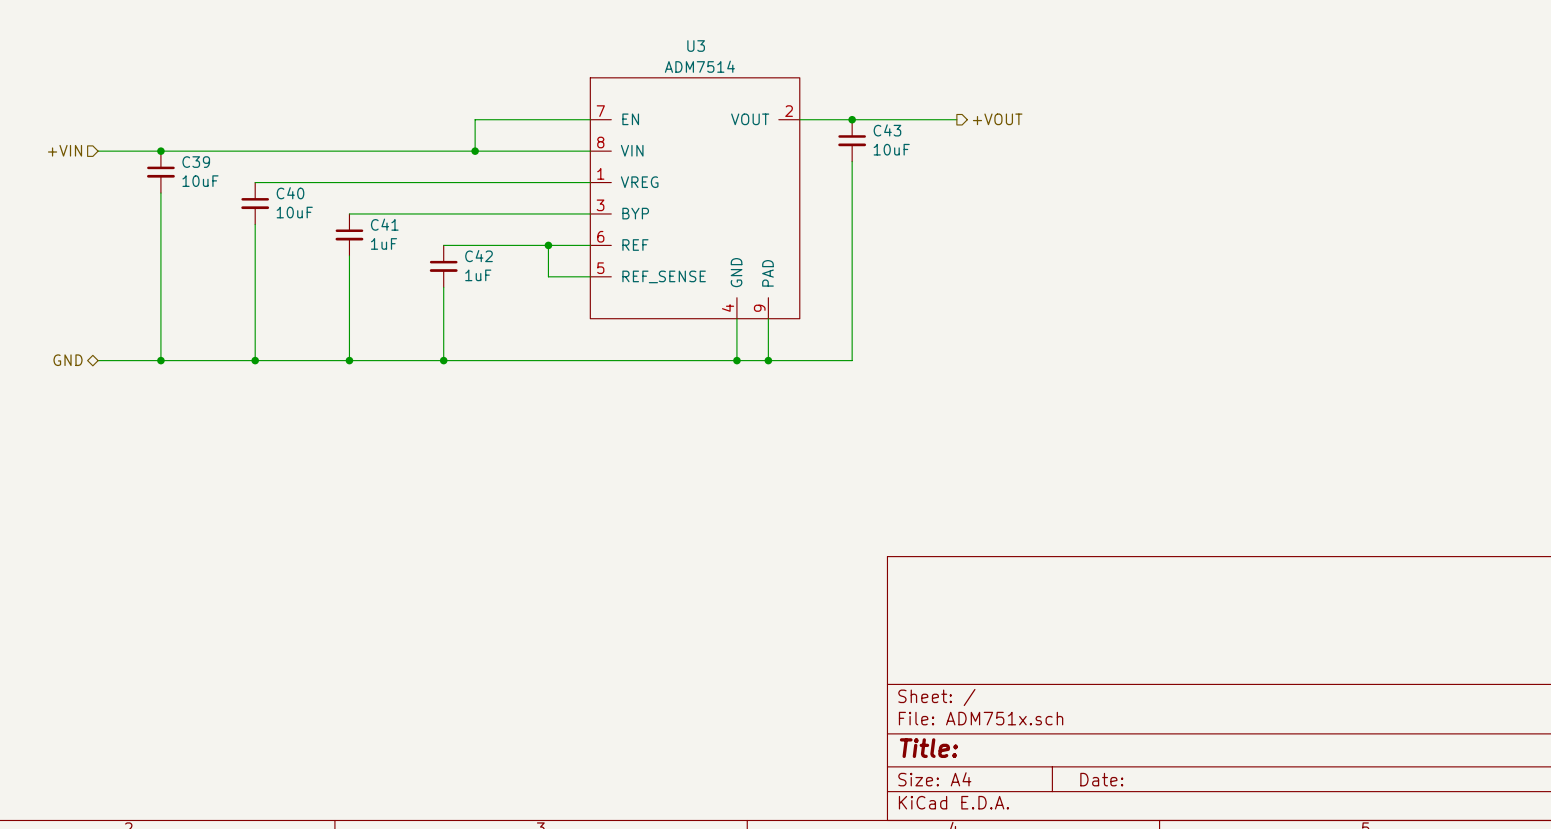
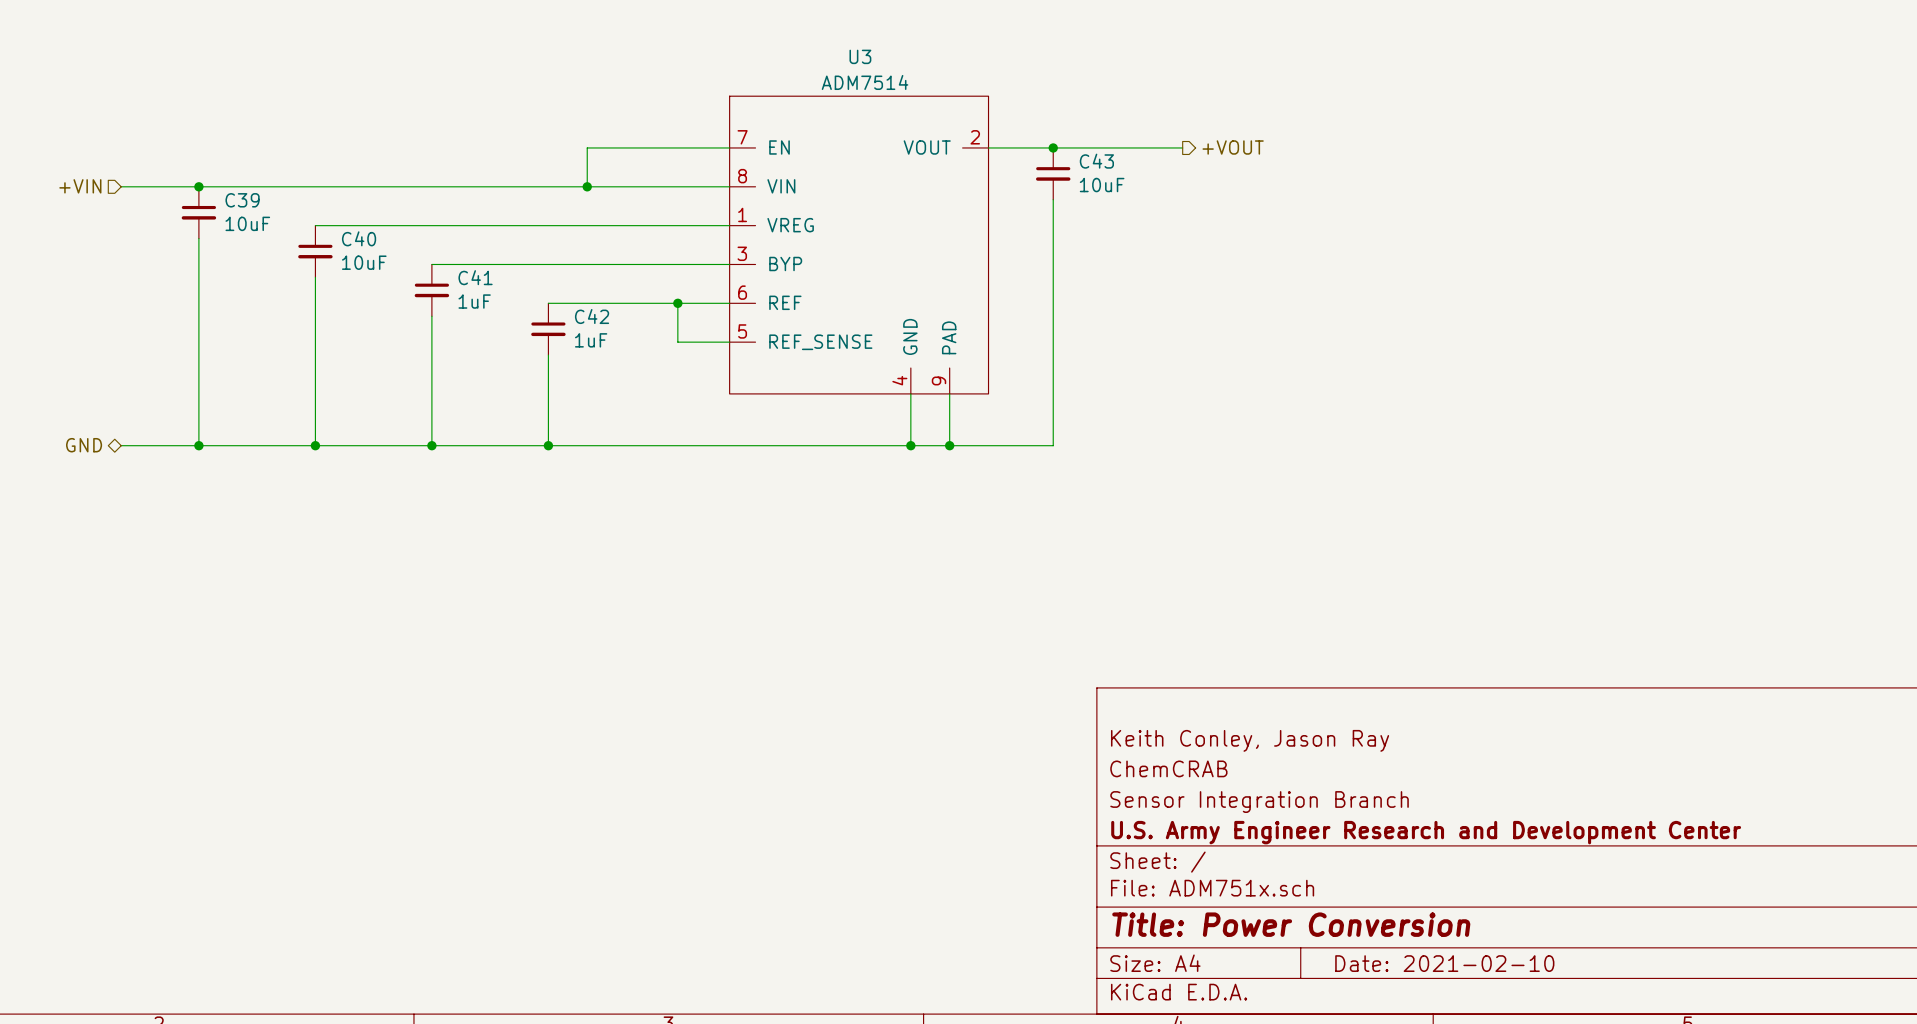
title block: none -> Keith Conley, Jason Ray (1250, 740)
title block: none -> ChemCRAB (1168, 768)
title block: none -> Sensor Integration Branch (1259, 802)
title block: none -> U.S. Army Engineer Research and Development Center (1426, 832)
title block: Title: (928, 748) -> Title: Power Conversion (1291, 924)
title block: Date: (1101, 779) -> Date: 2021-02-10 (1444, 963)

